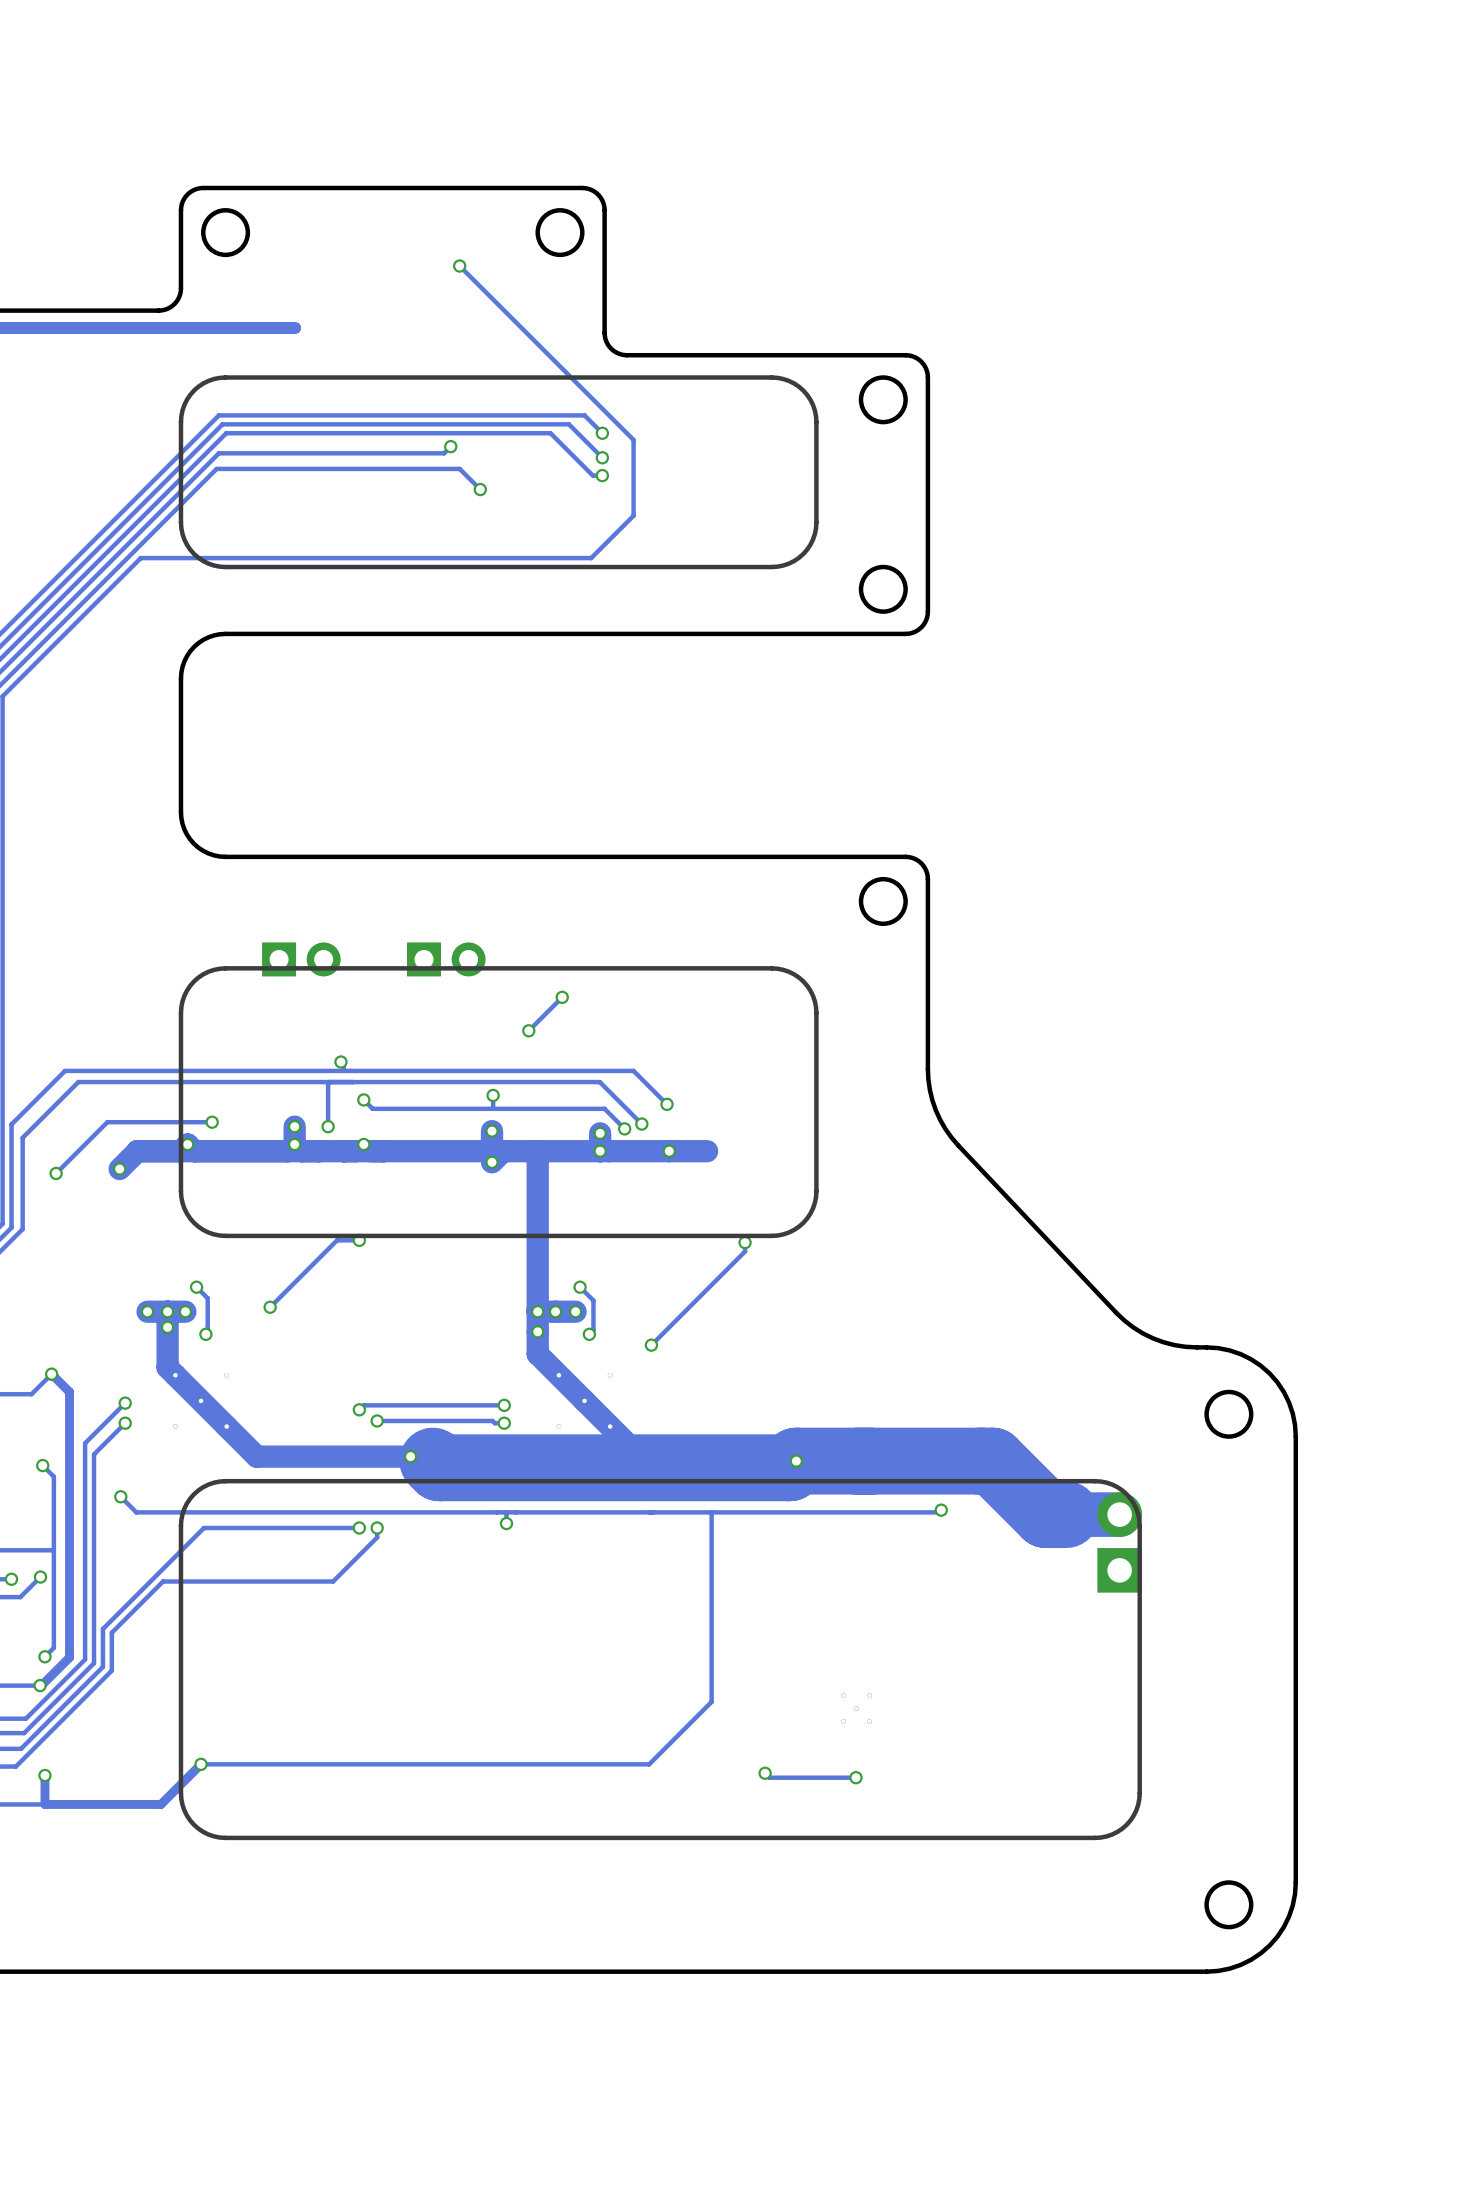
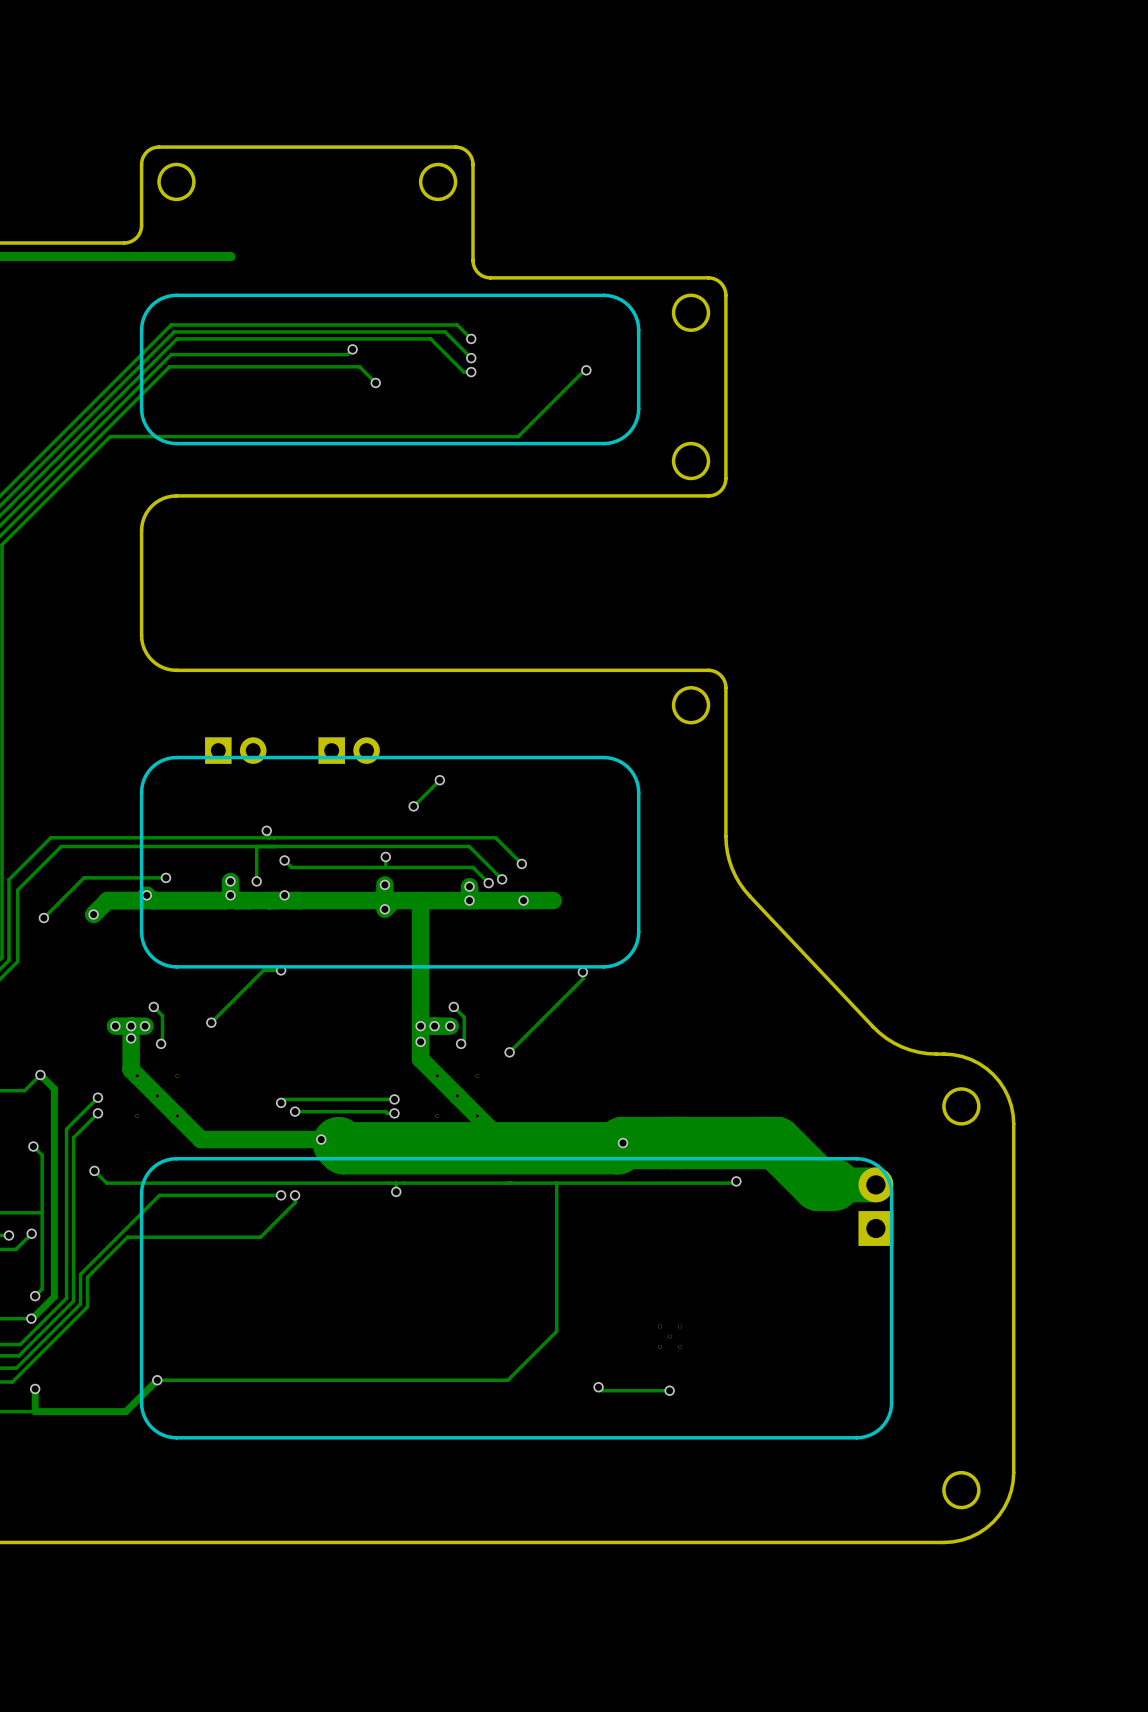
track: (459, 266) (633, 439) (633, 515) (591, 558) -> (586, 370) (586, 368) (518, 436) (462, 436)
via: (459, 266) -> none
via: none -> (586, 370)

